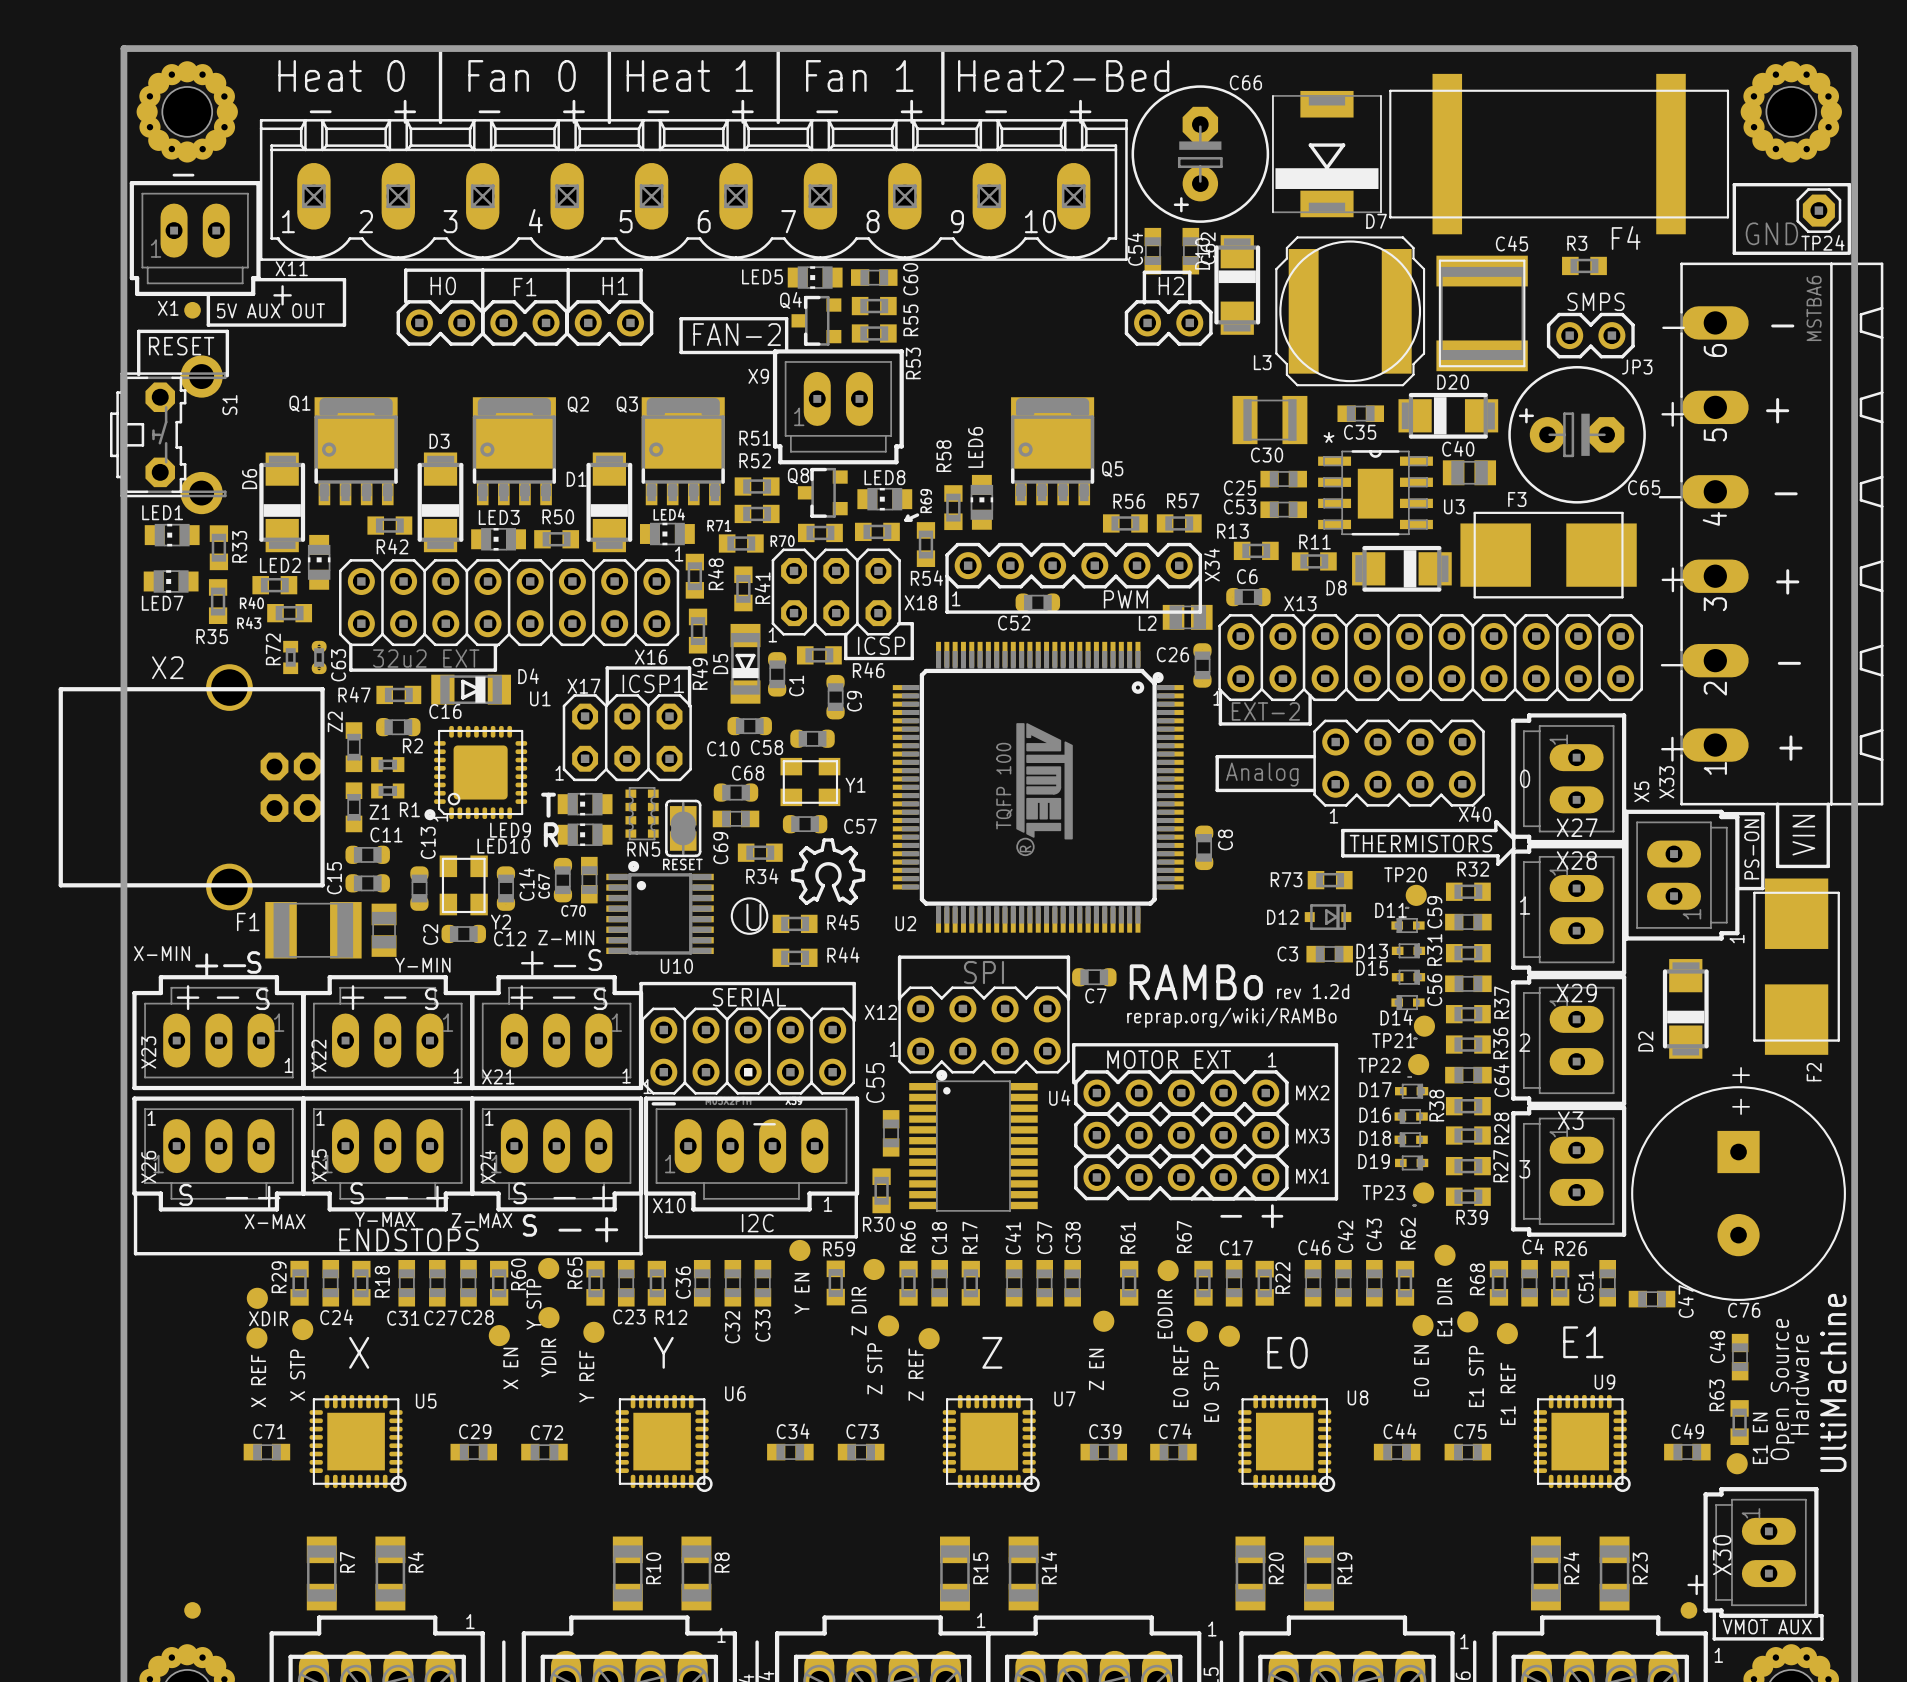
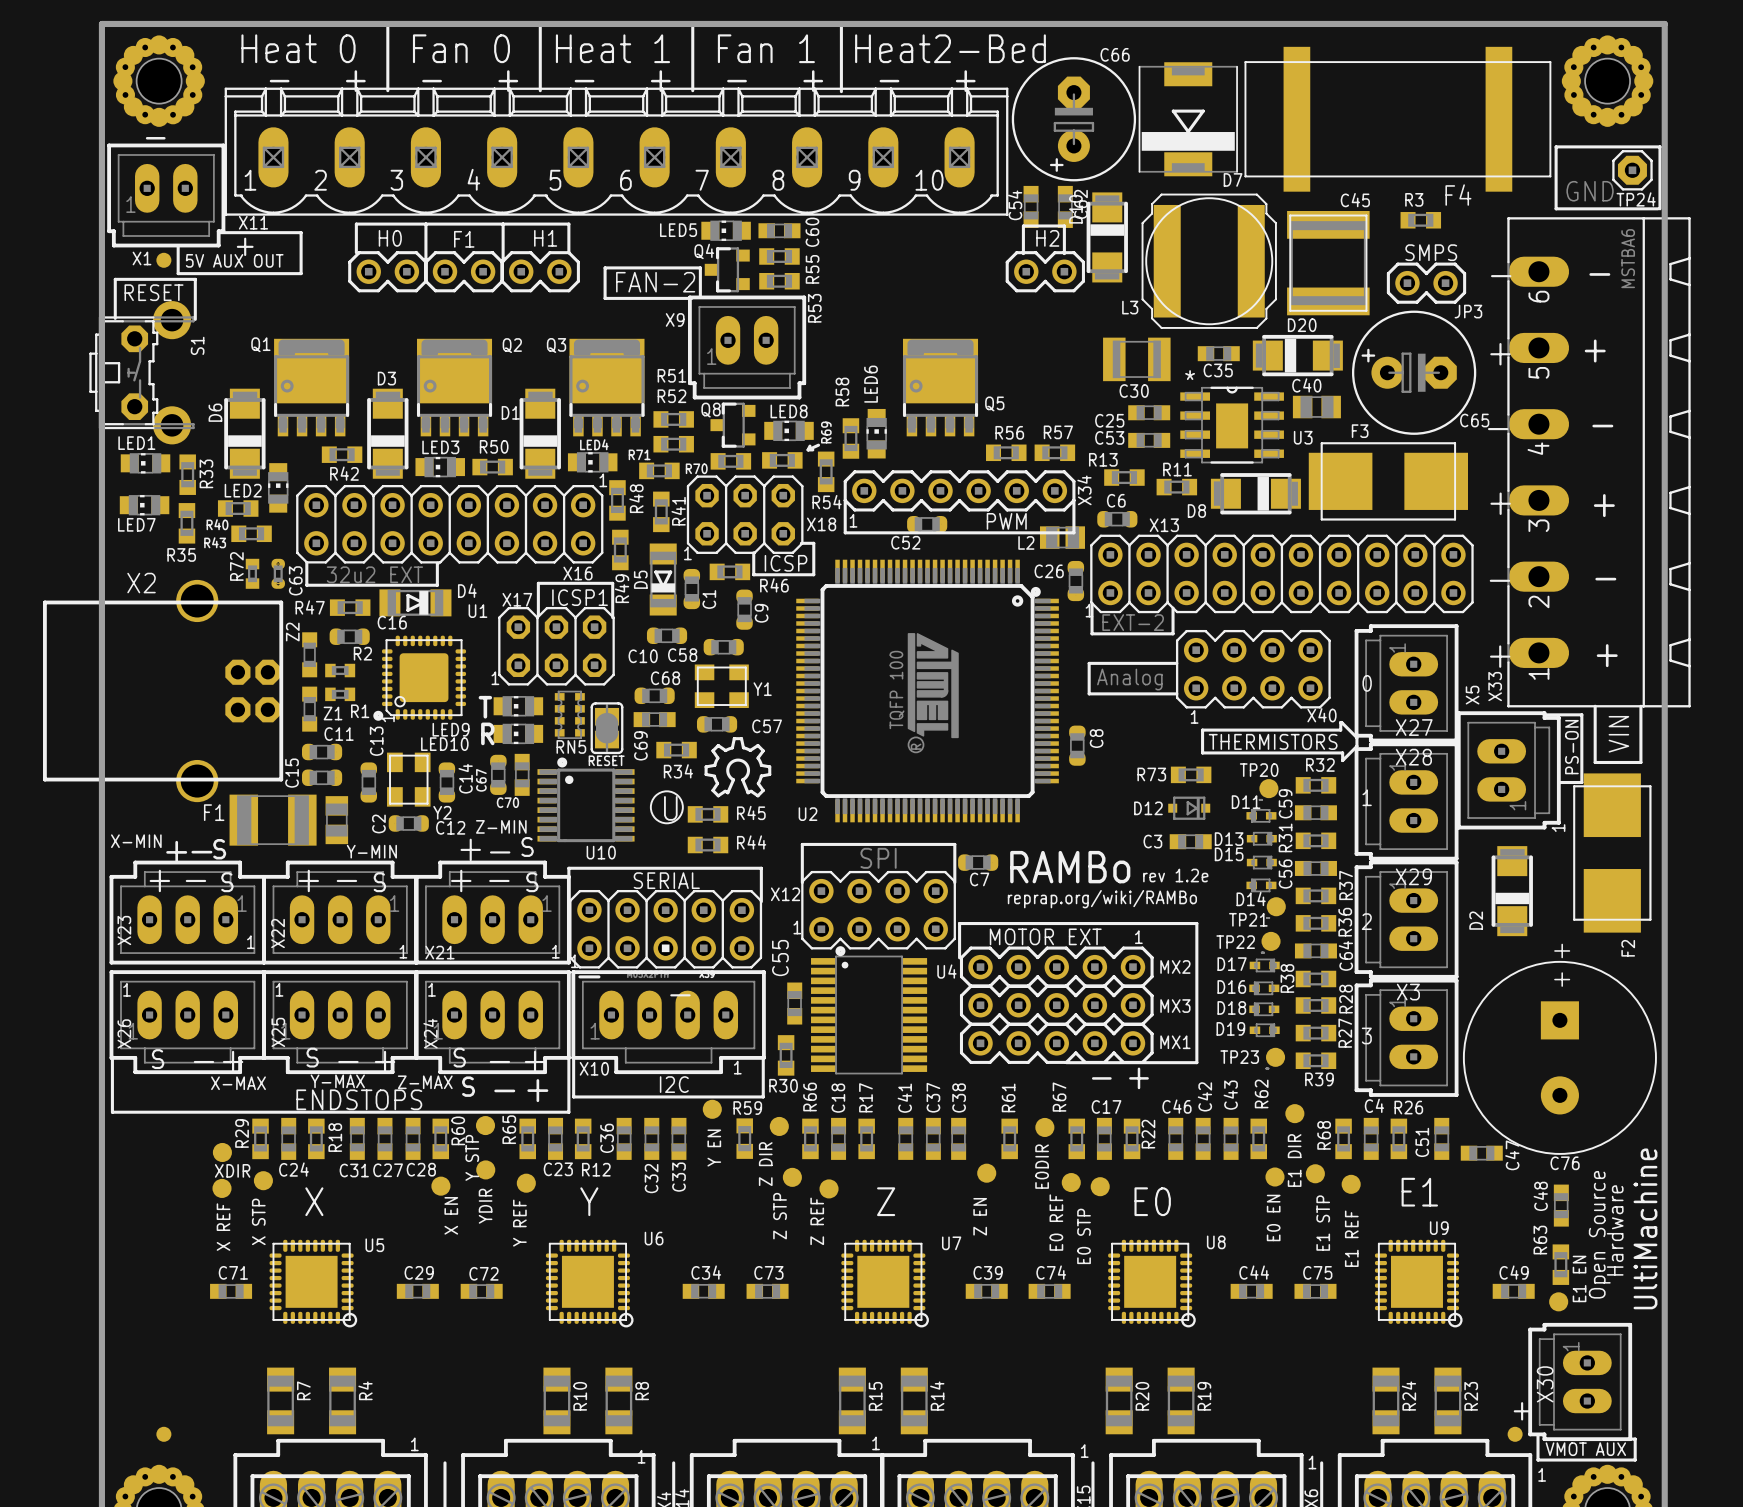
text: rev 1.2d (1313, 991) -> rev 1.2e (1175, 875)

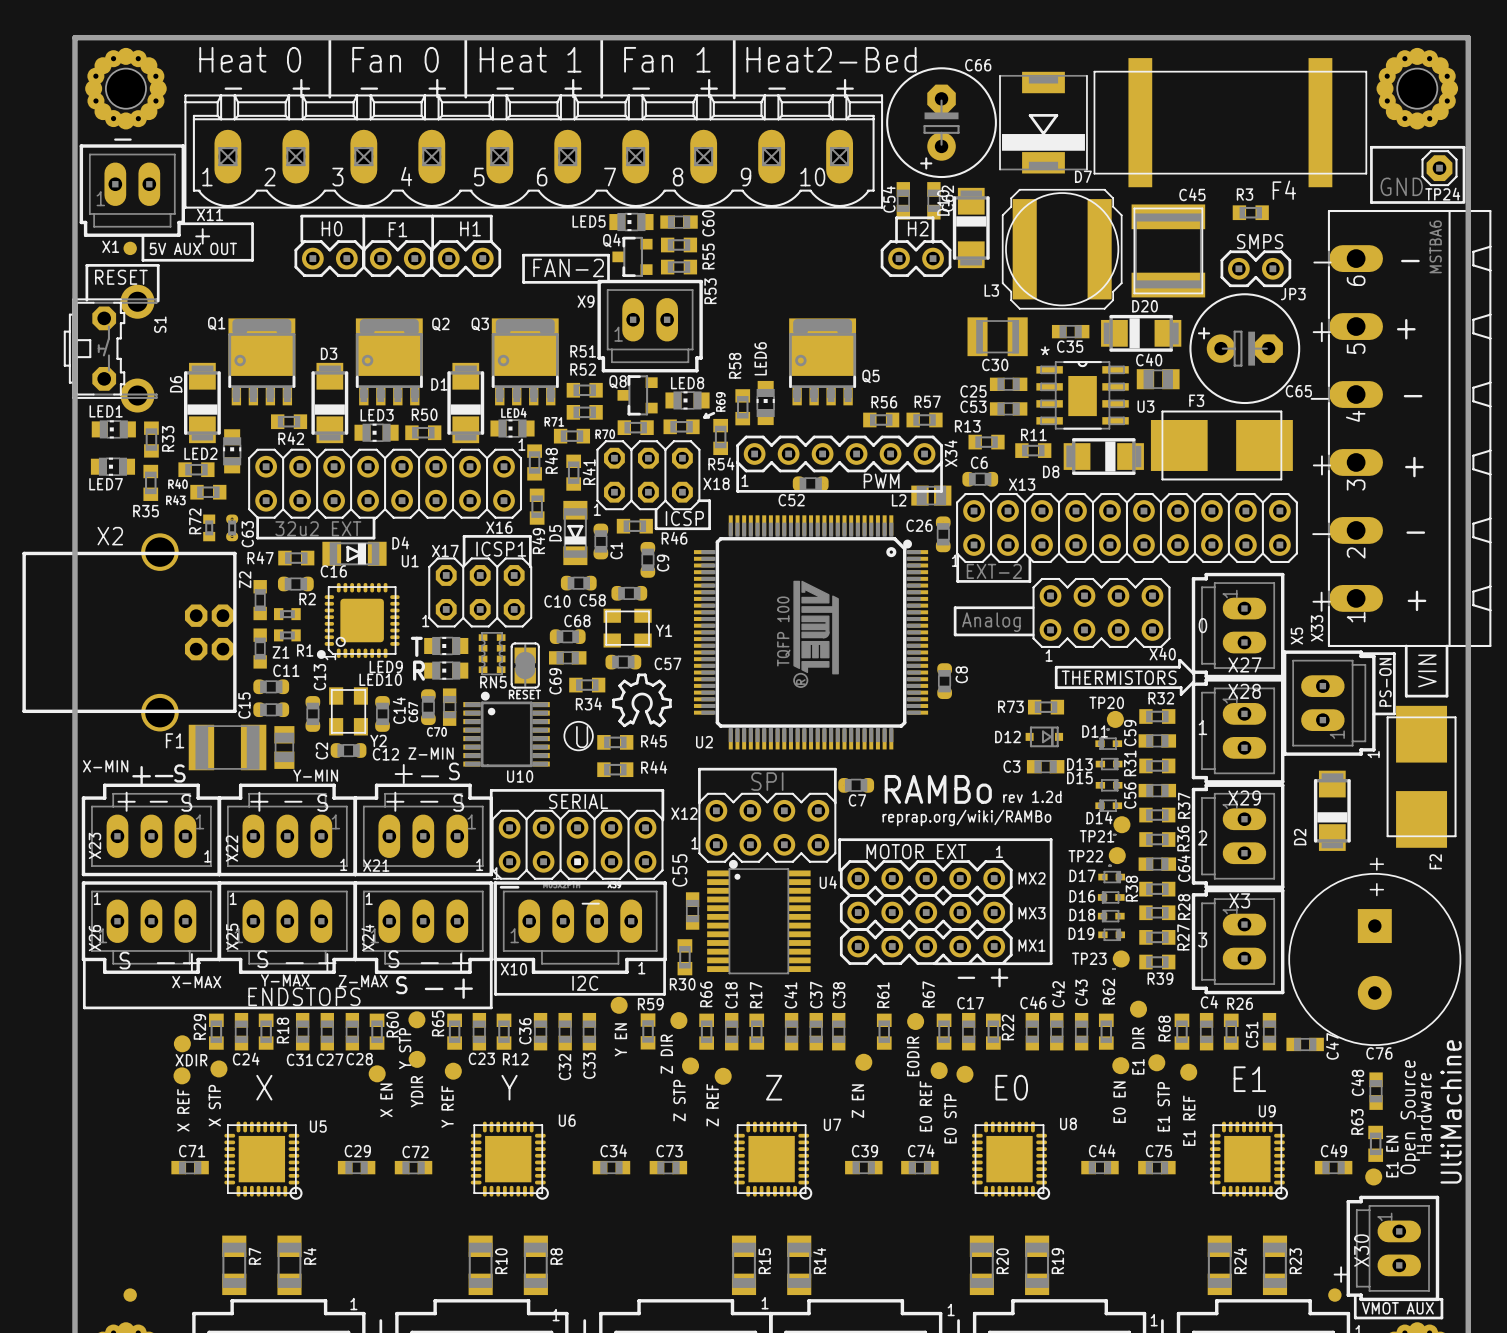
text: rev 1.2e (1175, 875) -> rev 1.2d (1032, 796)

